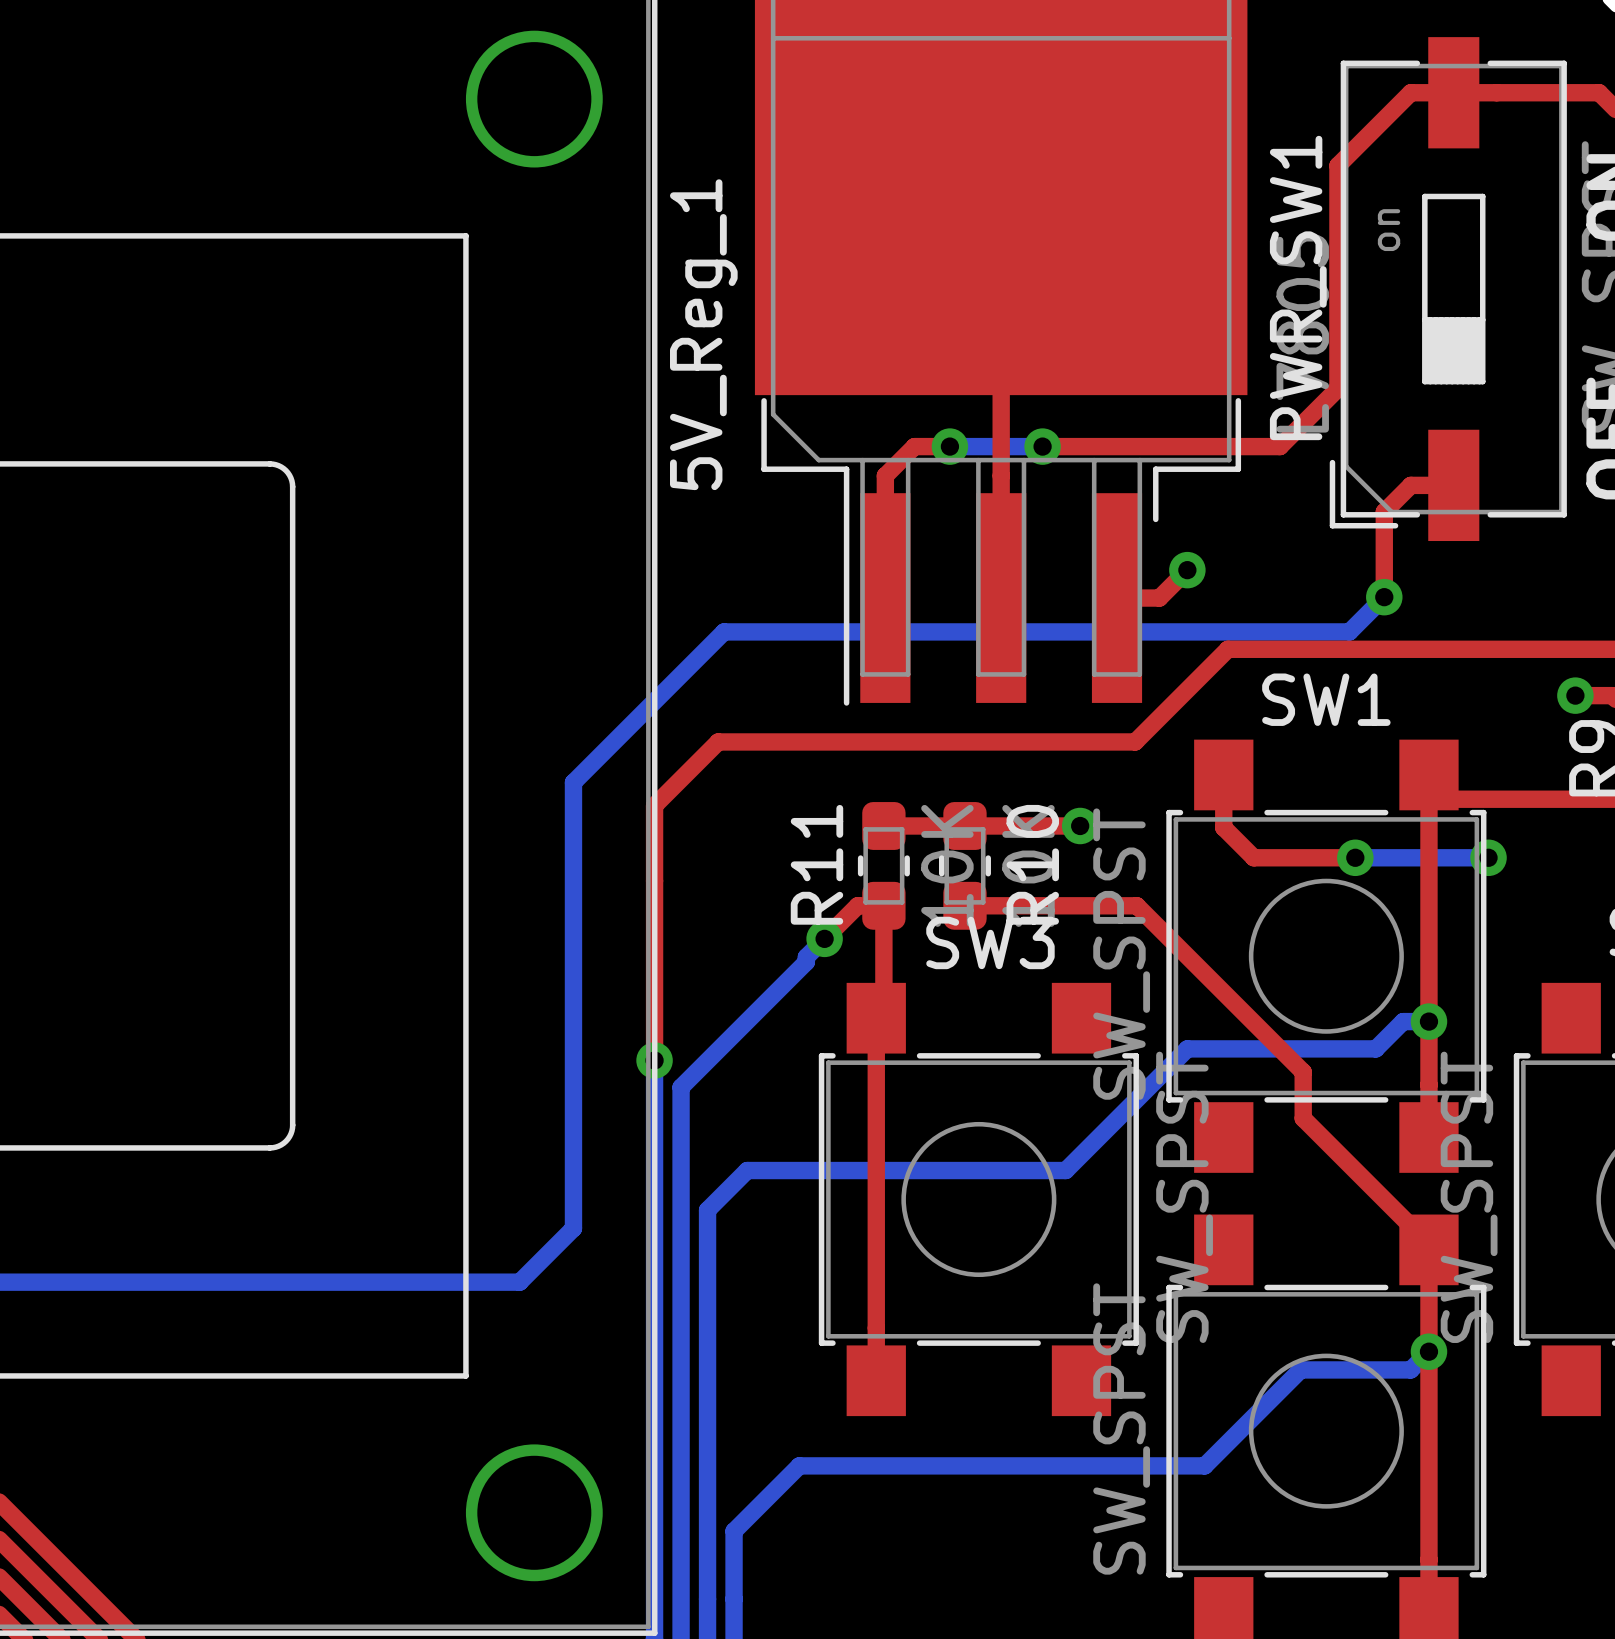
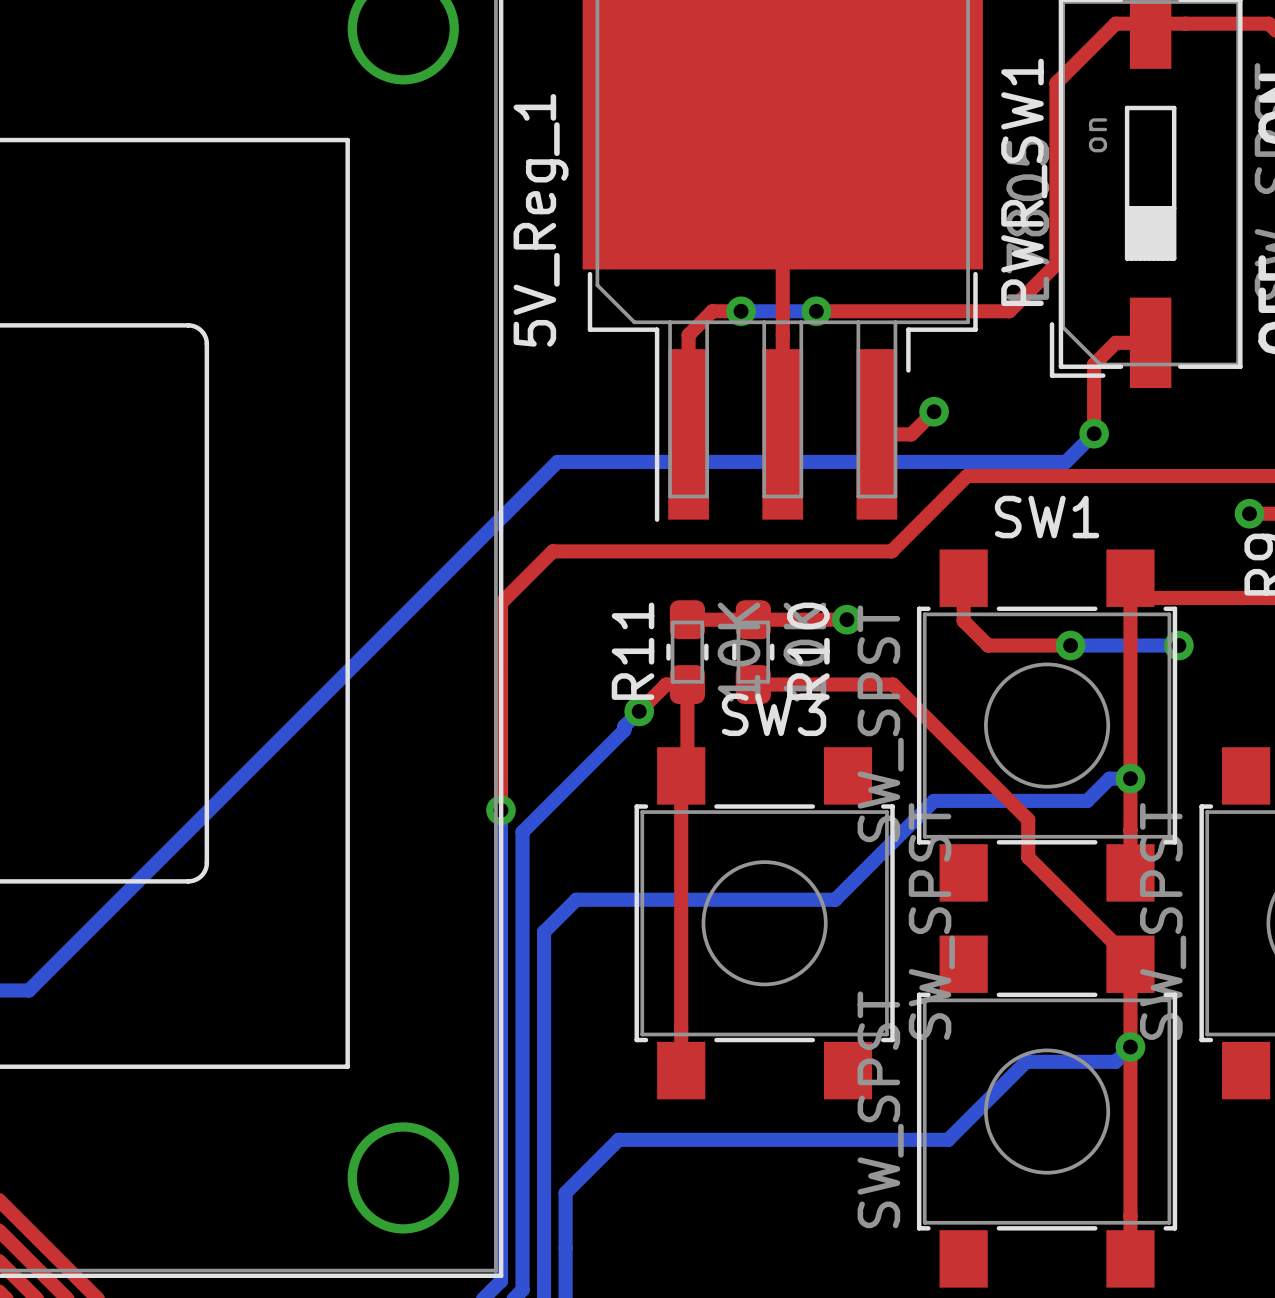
bottom track: (573, 782) (573, 1228) (519, 1282) (73, 1282) -> (435, 584) (28, 990)

